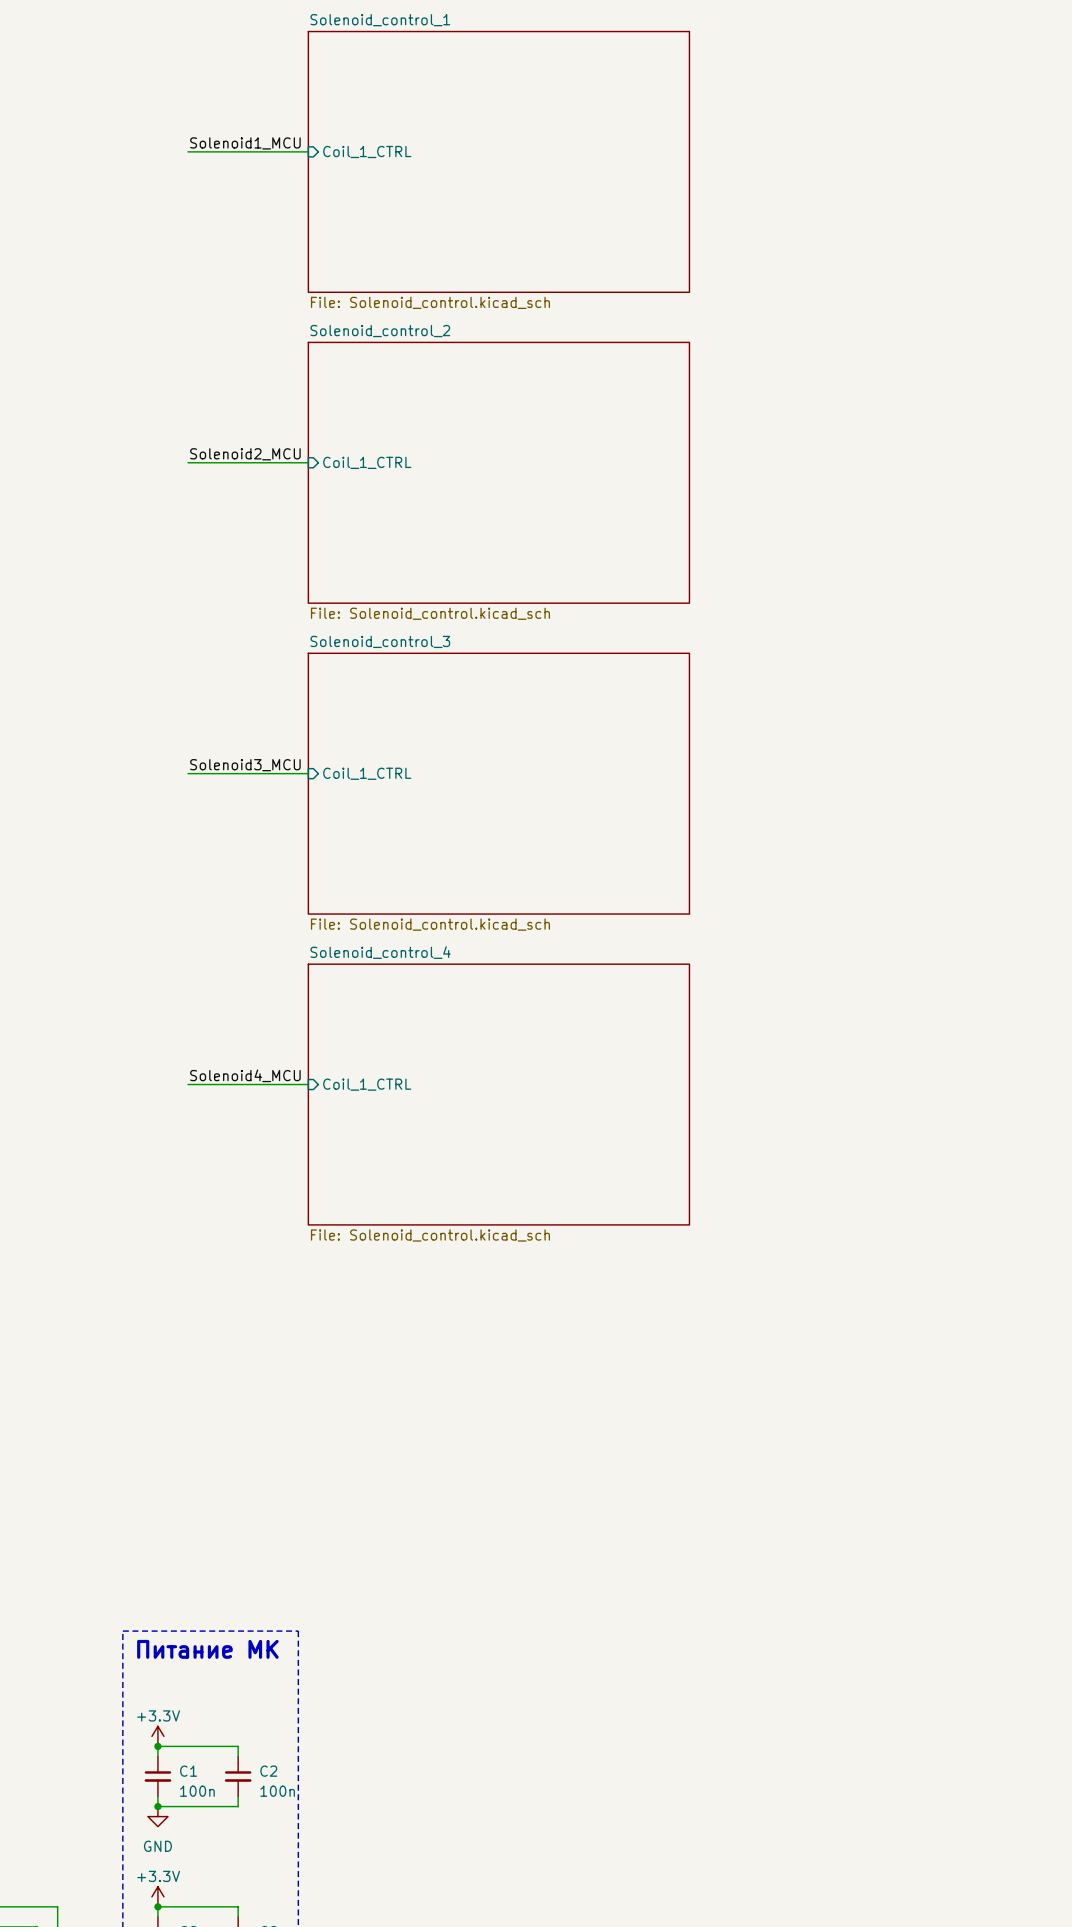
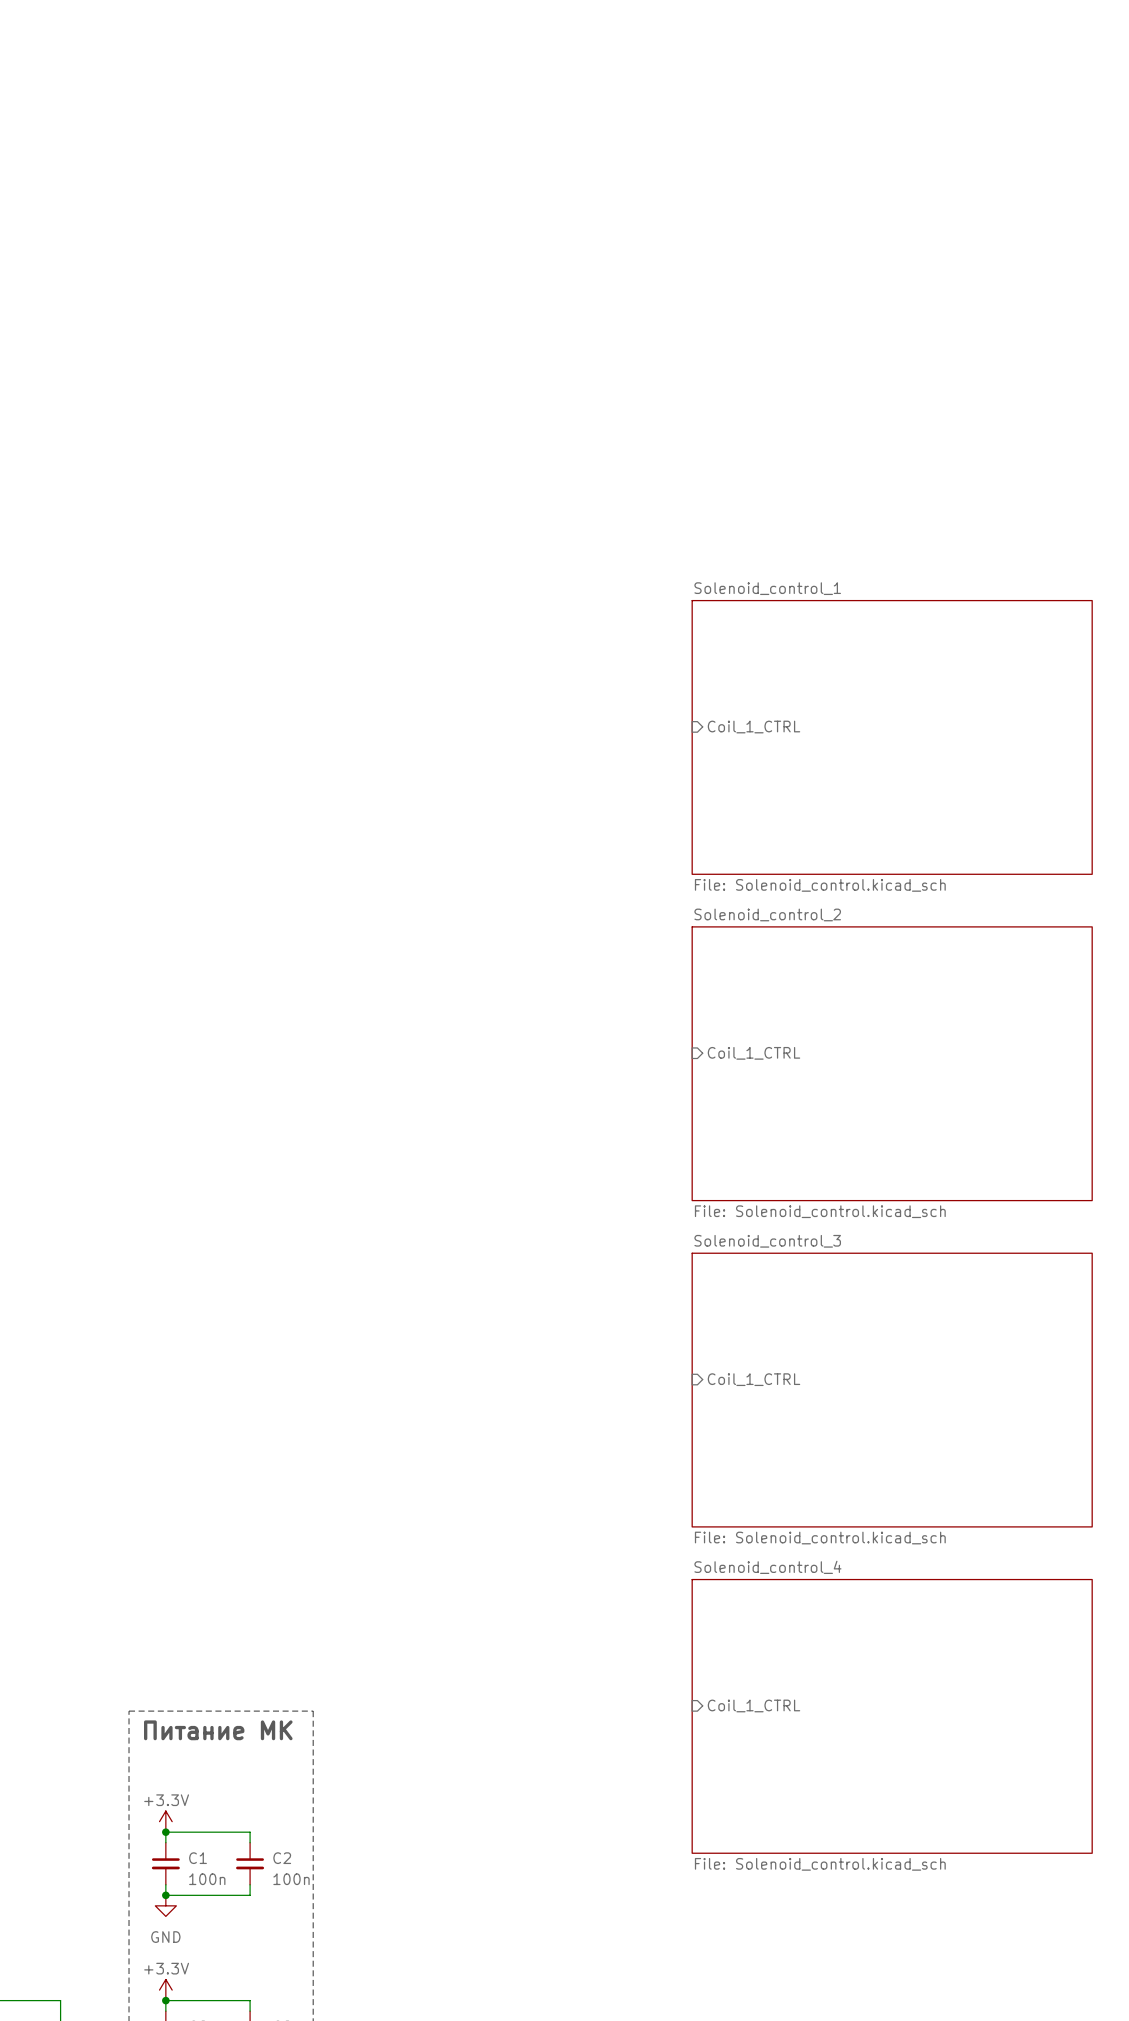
label: Solenoid1_MCU (245, 143) -> none
wire: (188, 151) (308, 151) -> none
sheet pin: Coil_1_CTRL (367, 151) -> none
sheet Solenoid_control_1 position: (498, 161) -> (892, 737)
label: Solenoid2_MCU (245, 454) -> none
wire: (188, 462) (308, 462) -> none
sheet pin: Coil_1_CTRL (367, 462) -> none
sheet Solenoid_control_2 position: (498, 472) -> (892, 1063)
sheet pin: none -> Coil_1_CTRL (753, 727)
label: Solenoid3_MCU (245, 765) -> none
wire: (188, 773) (308, 773) -> none
sheet pin: Coil_1_CTRL (367, 773) -> none
sheet Solenoid_control_3 position: (498, 783) -> (892, 1390)
sheet pin: none -> Coil_1_CTRL (753, 1053)
label: Solenoid4_MCU (245, 1075) -> none
wire: (188, 1084) (308, 1084) -> none
sheet pin: Coil_1_CTRL (367, 1084) -> none
sheet Solenoid_control_4 position: (498, 1094) -> (892, 1716)
sheet pin: none -> Coil_1_CTRL (753, 1379)
sheet pin: none -> Coil_1_CTRL (753, 1705)

